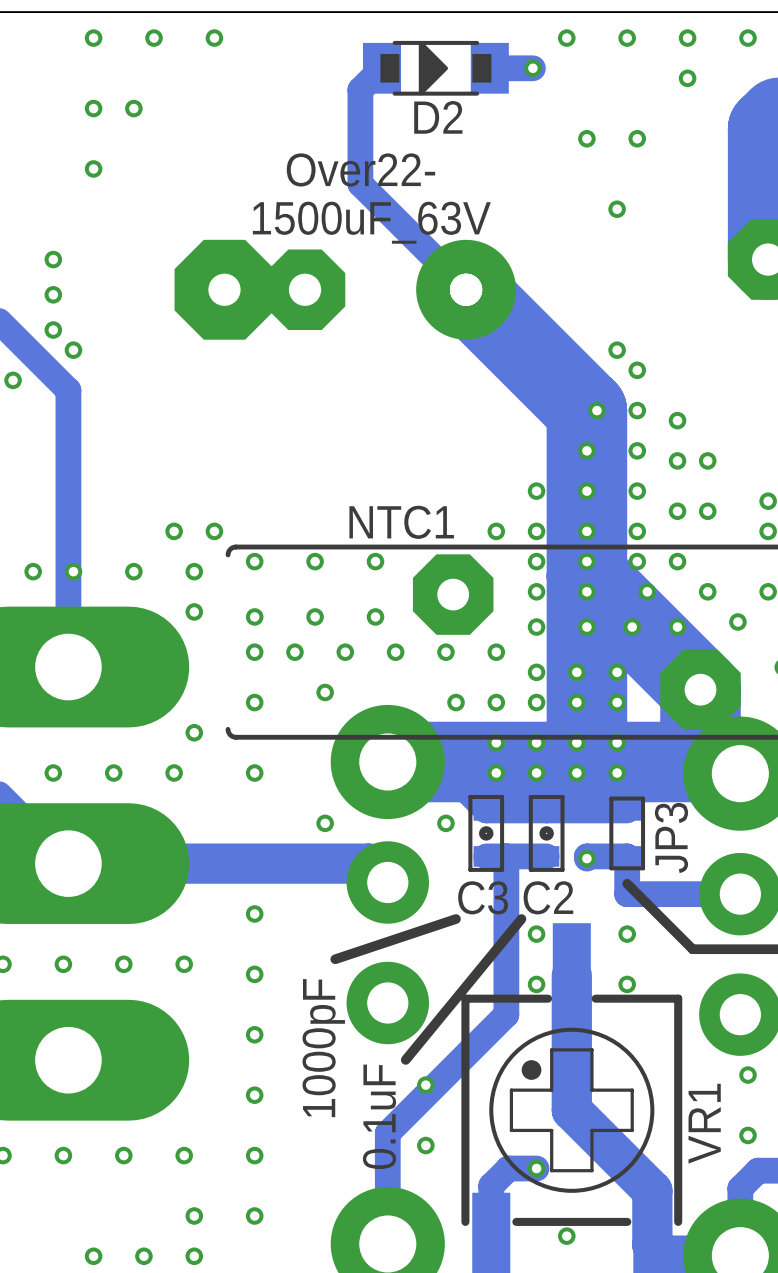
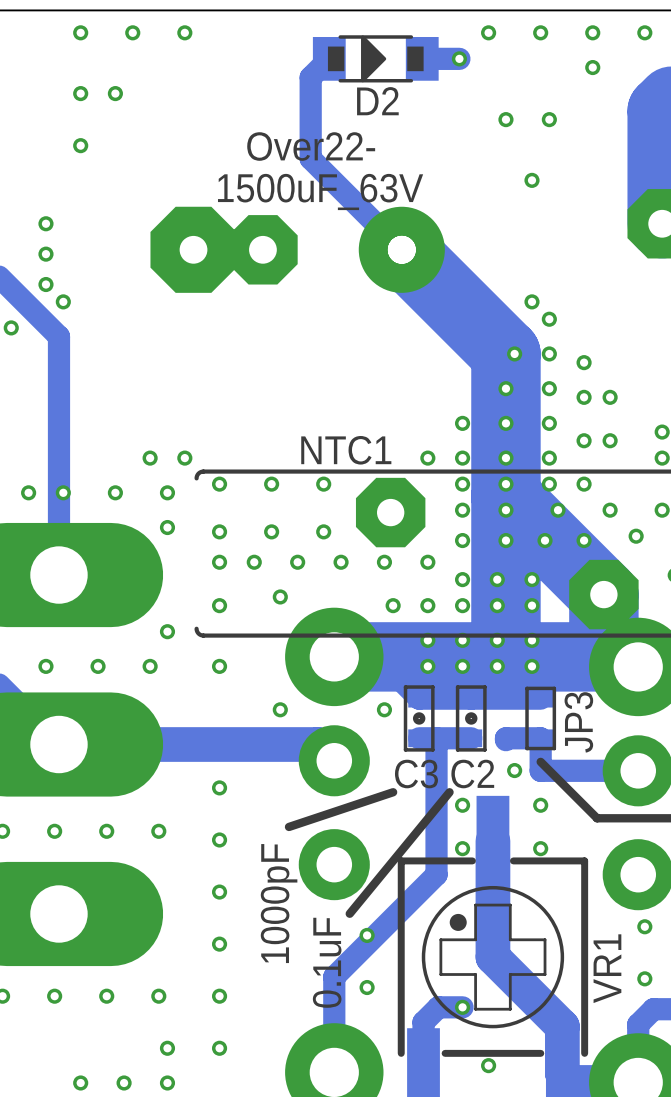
via position: (586, 858) -> (514, 770)

